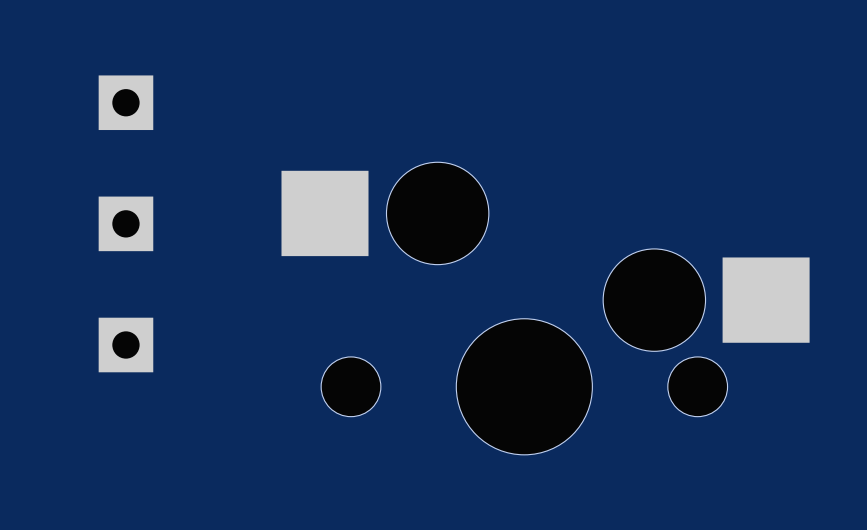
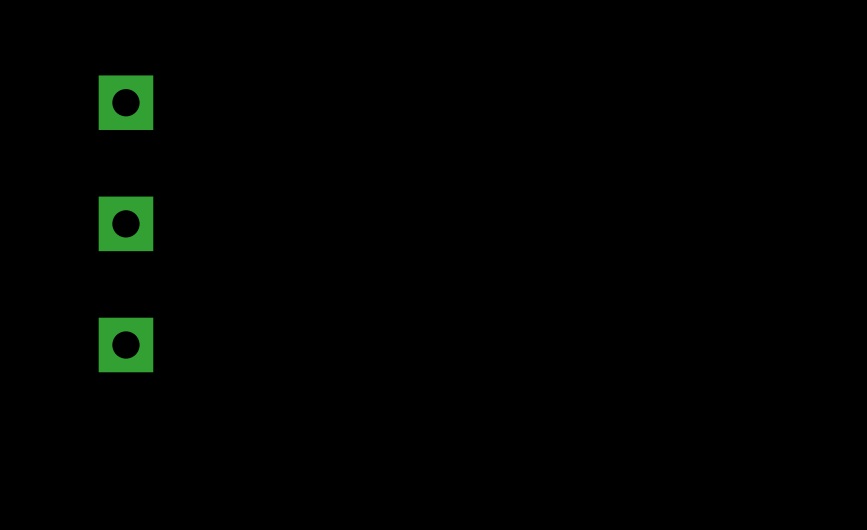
part: (545, 308) -> none

